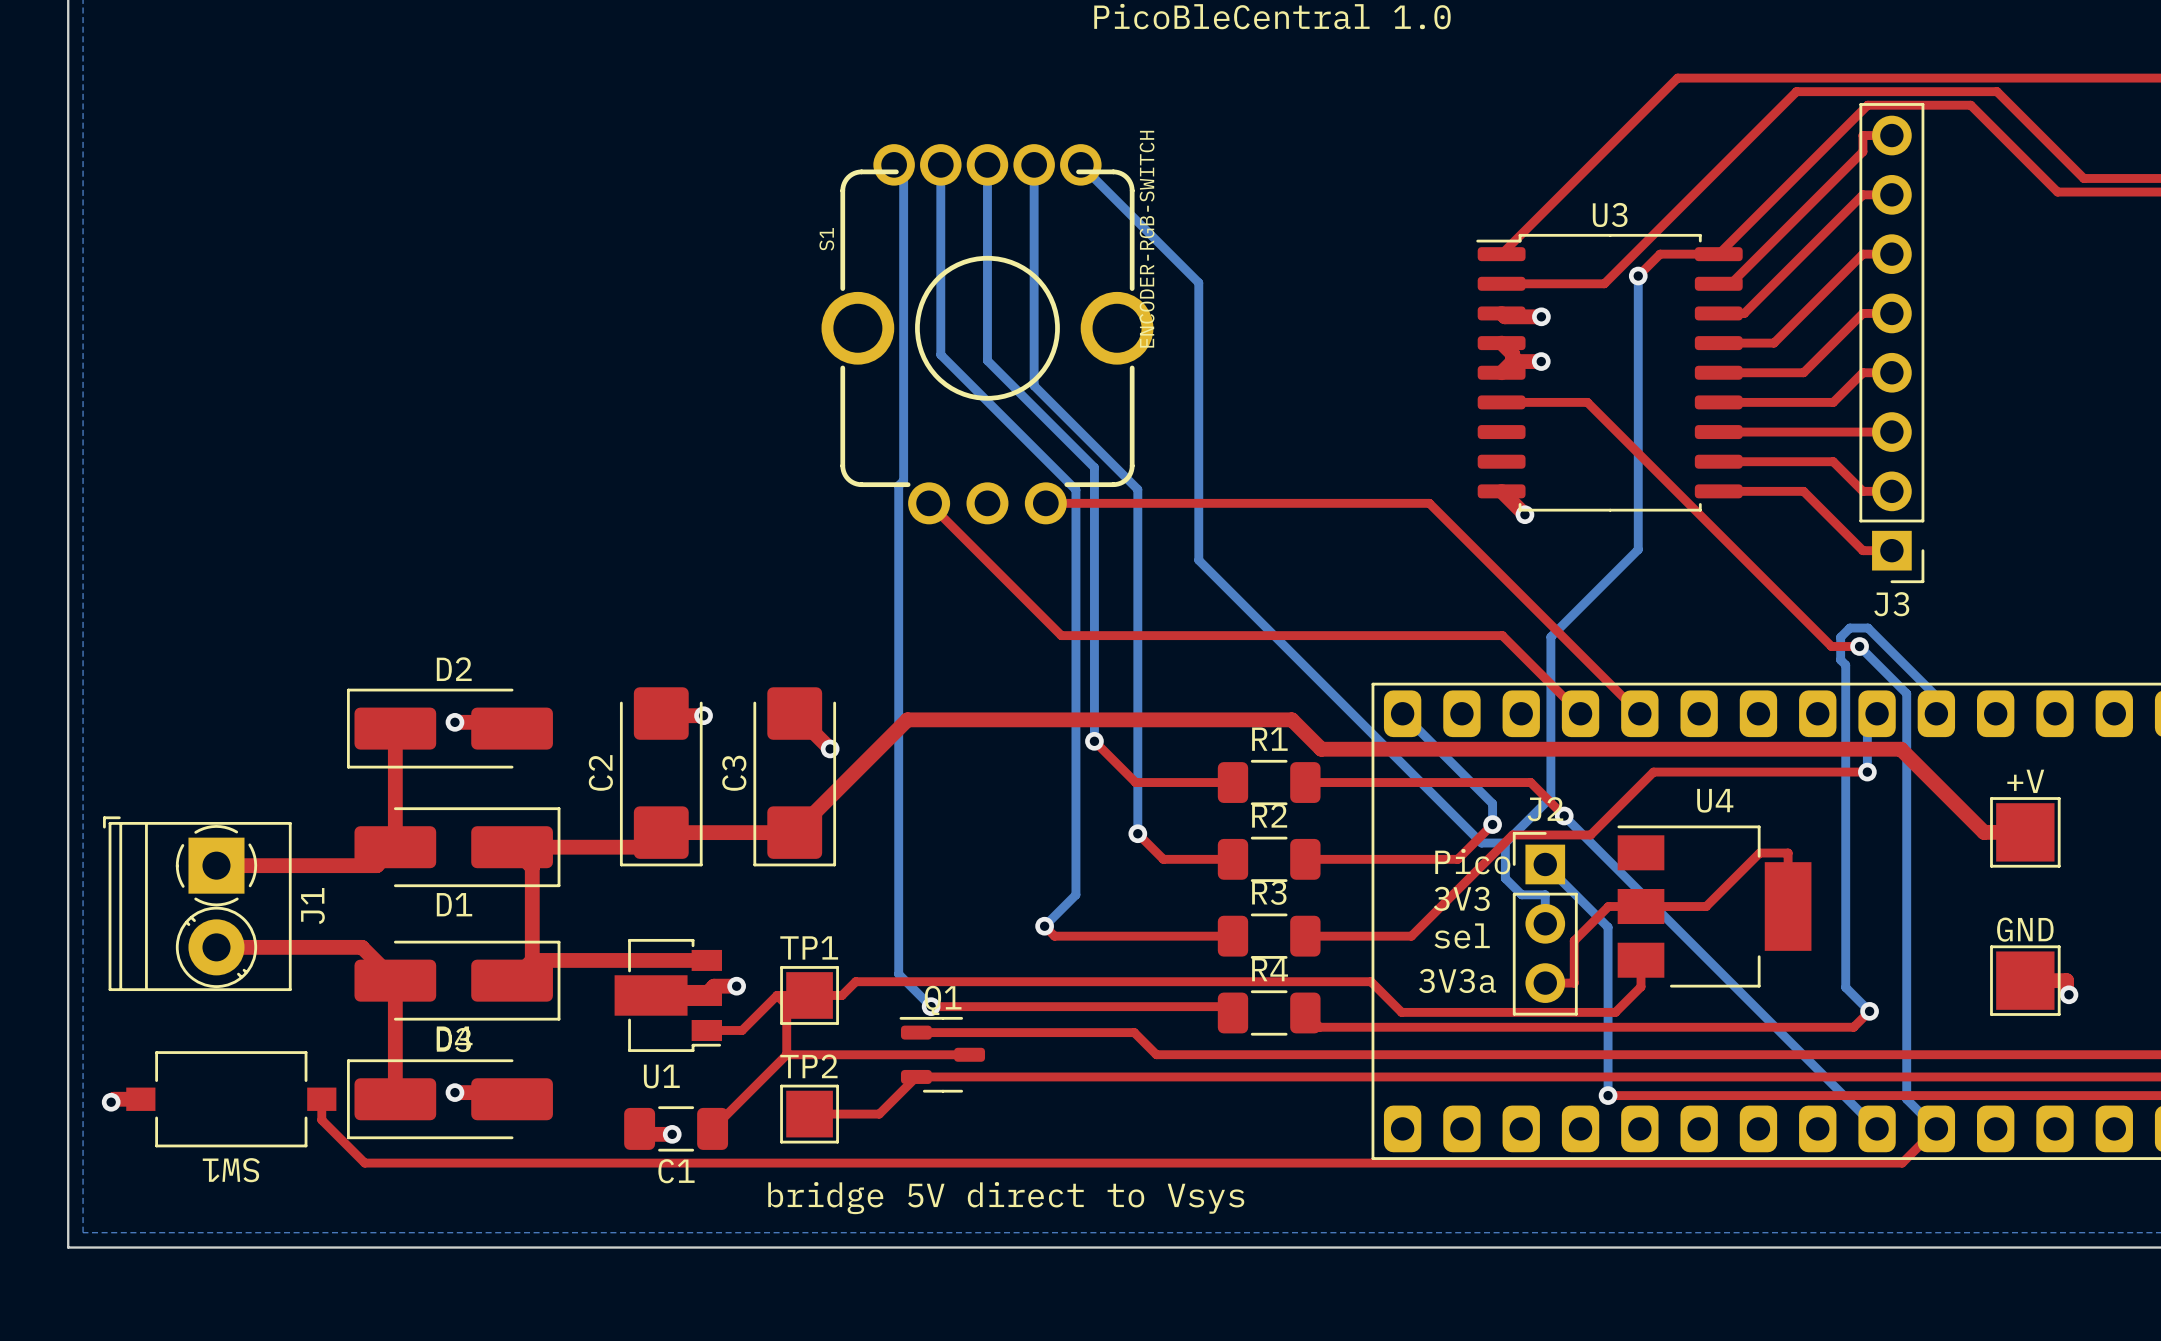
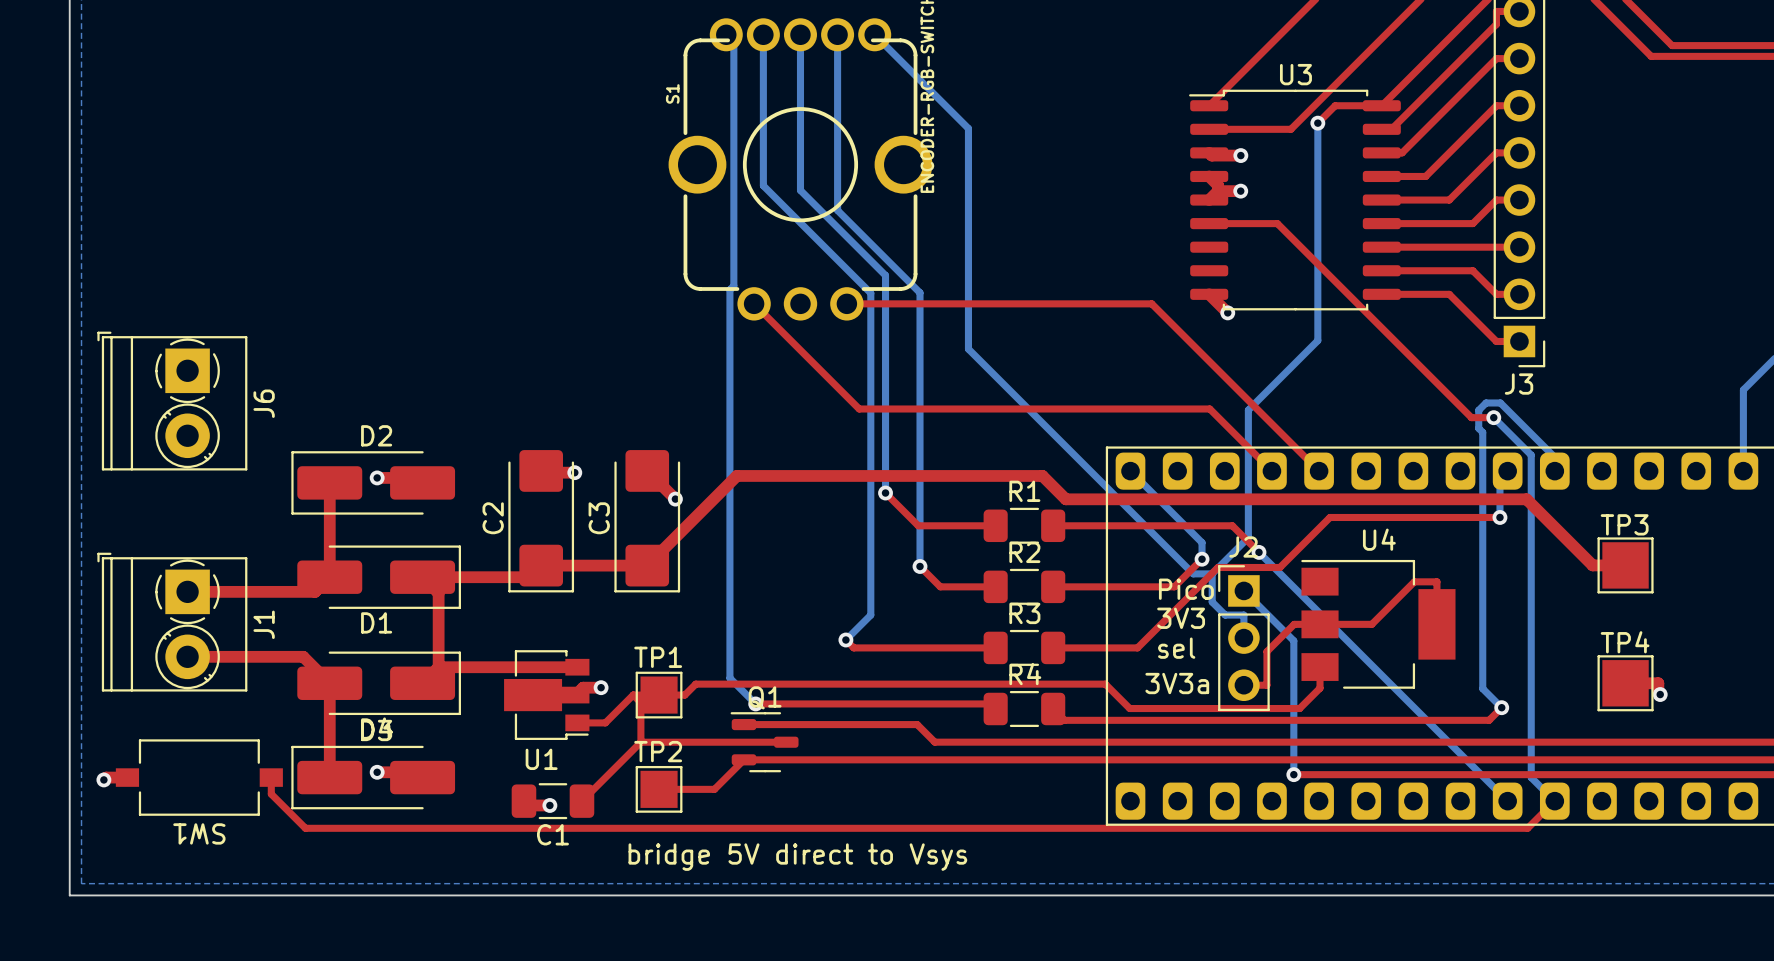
J6: none -> (172, 401)
+V name: +V (2025, 781) -> TP3 (1624, 524)
GND name: GND (2025, 929) -> TP4 (1625, 642)

